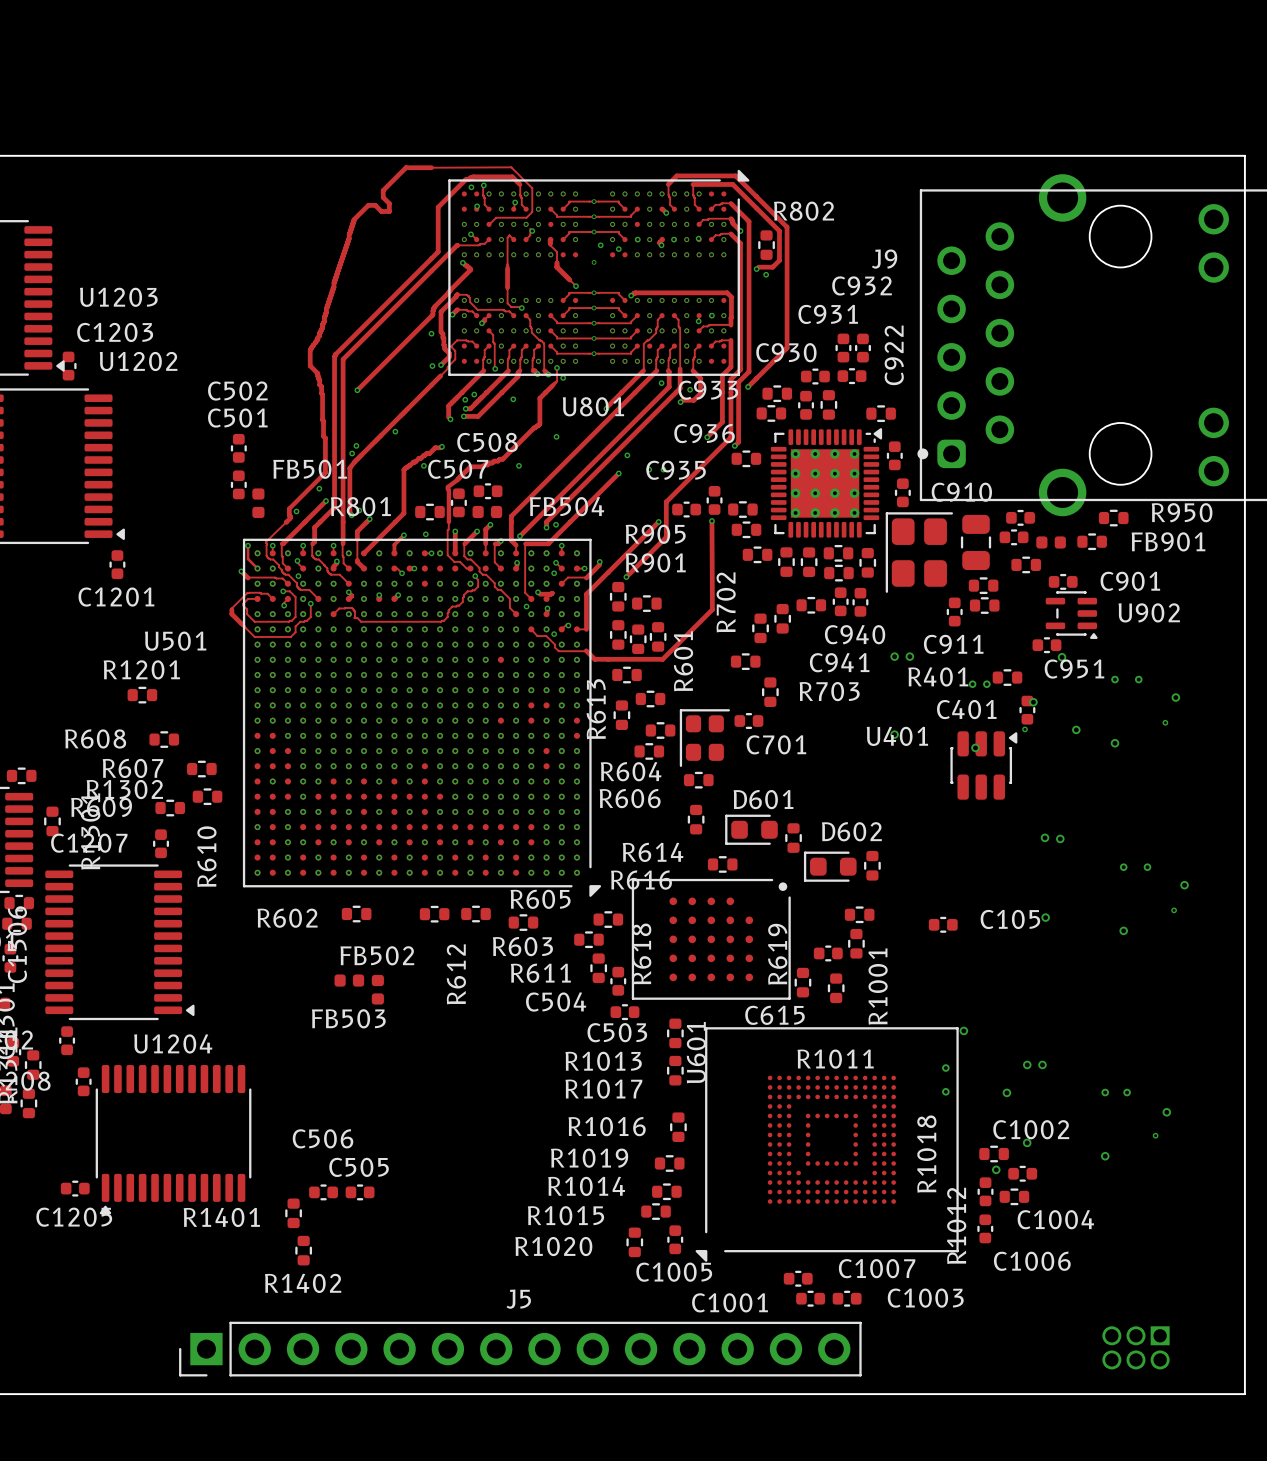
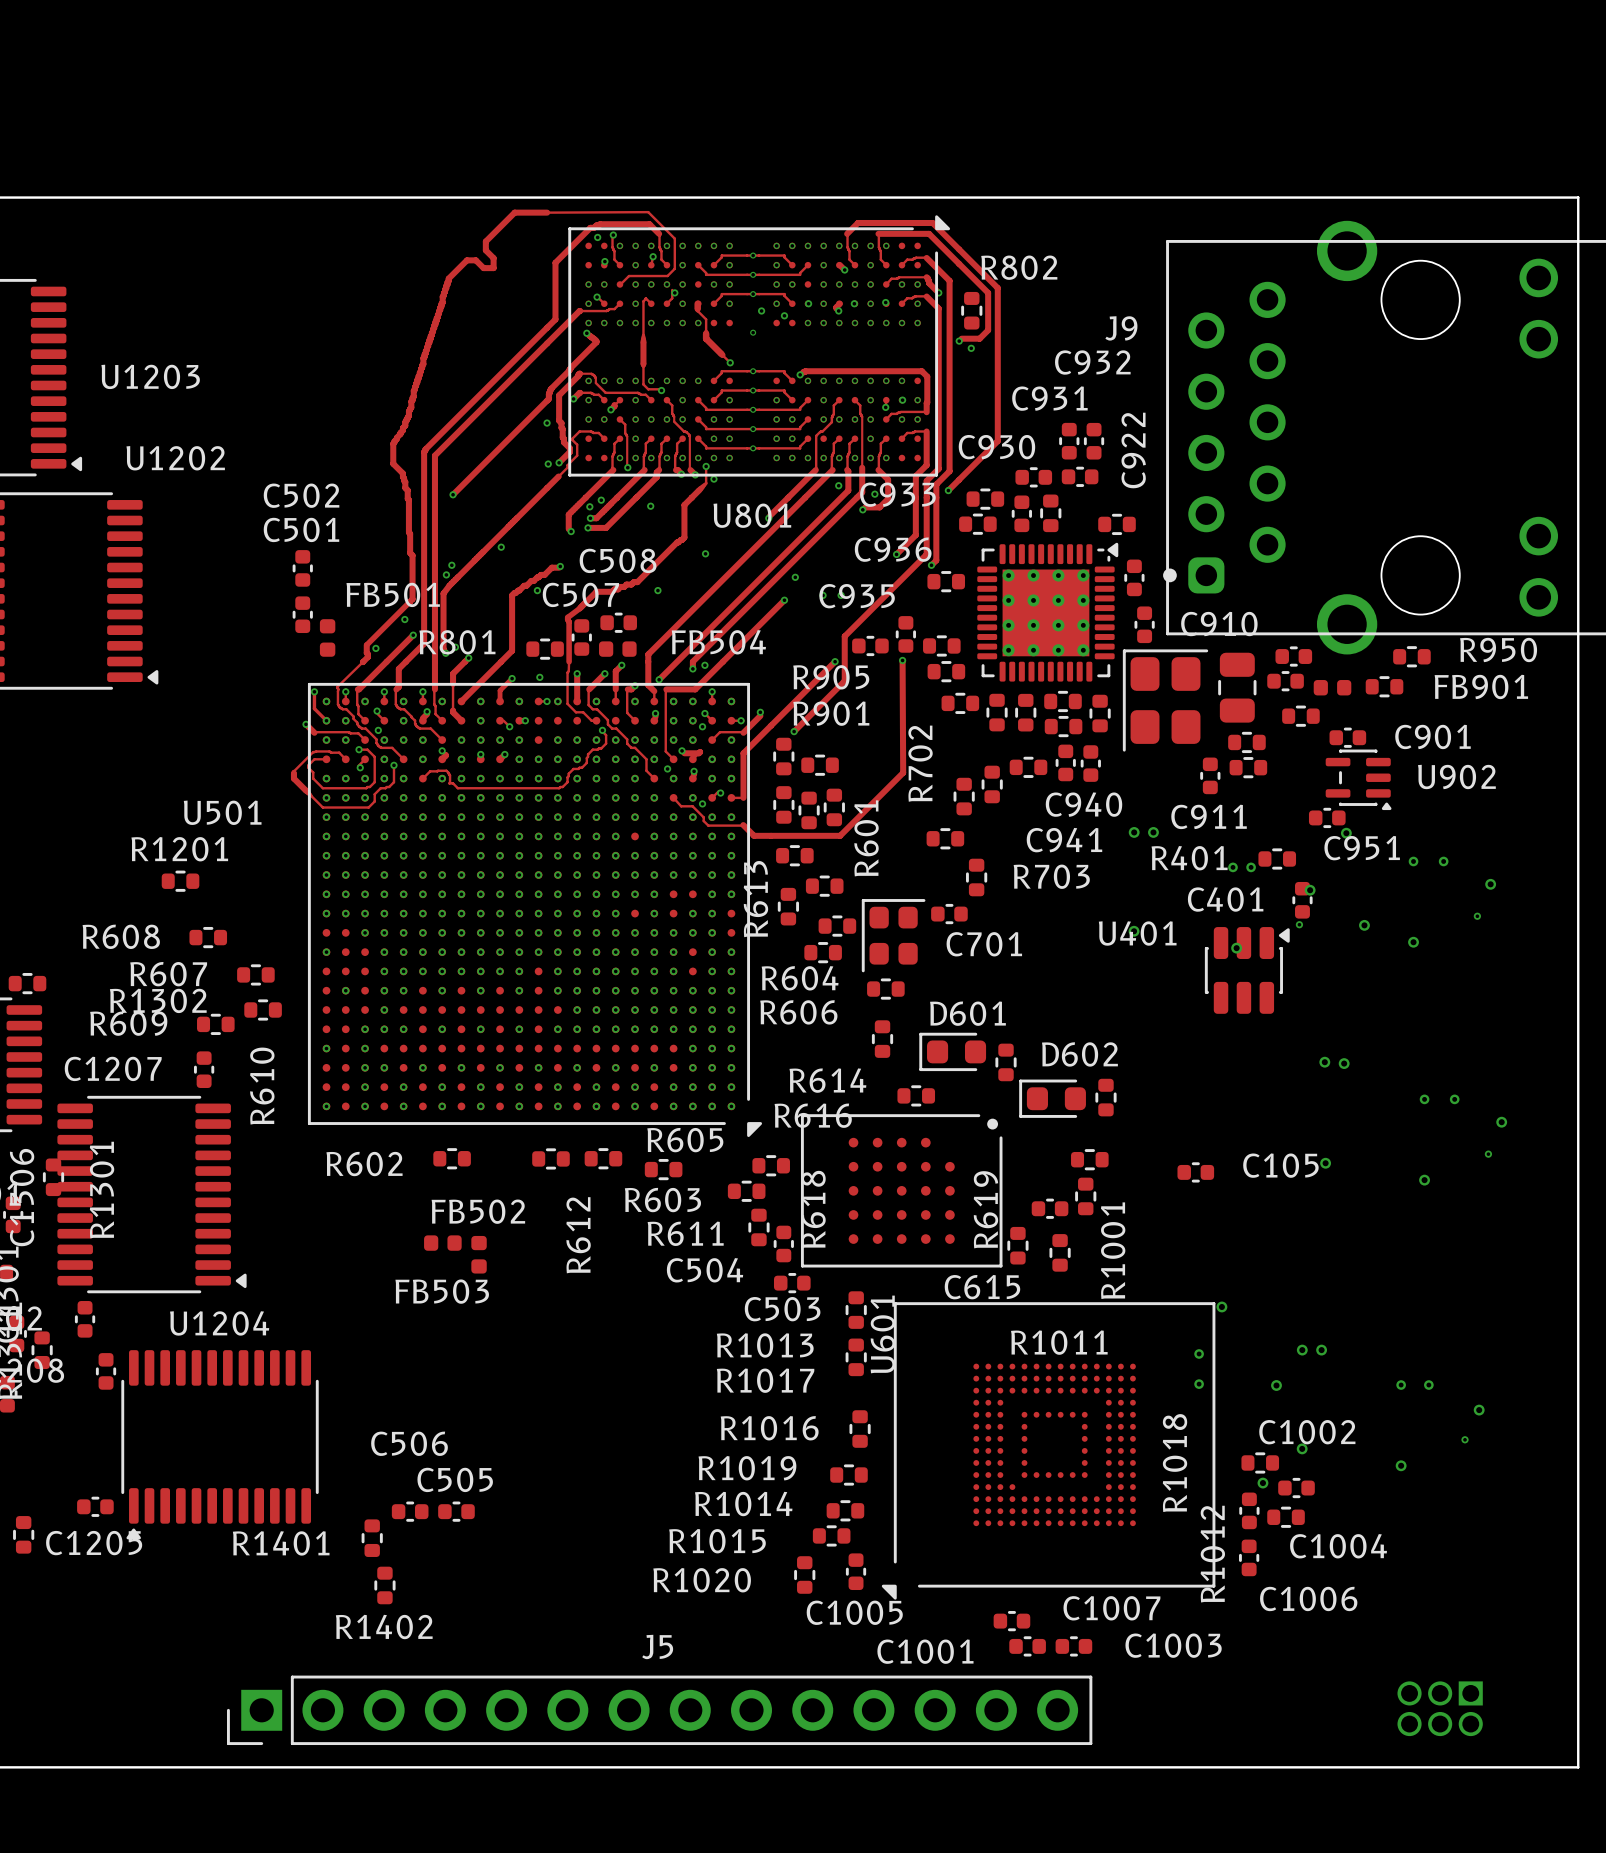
C1203: (68, 366) -> none
C1201: (117, 564) -> none
R1301 position: (52, 821) -> (53, 1177)
part: (19, 903) -> none
part: (17, 923) -> none
part: (28, 1103) -> none
part: none -> (23, 1534)

